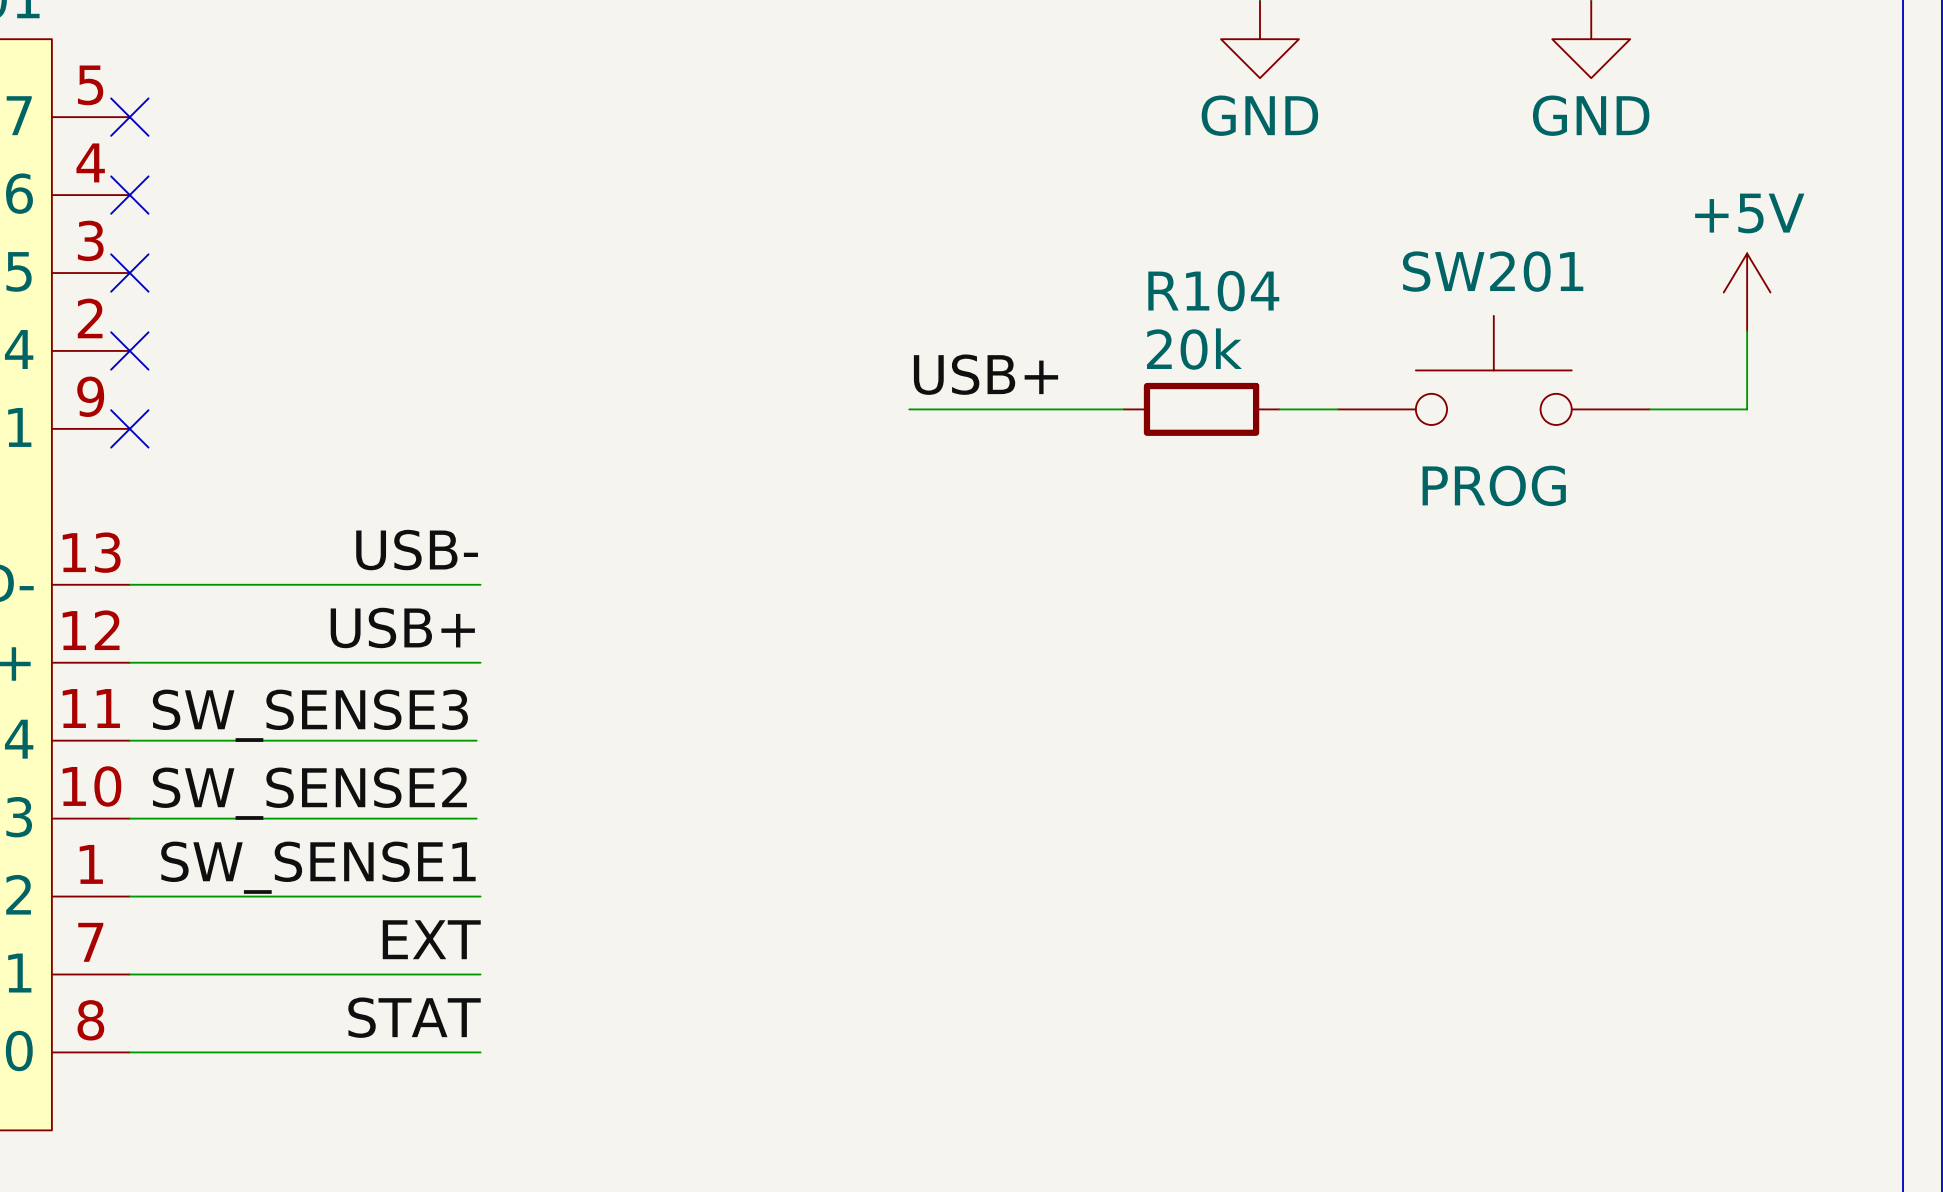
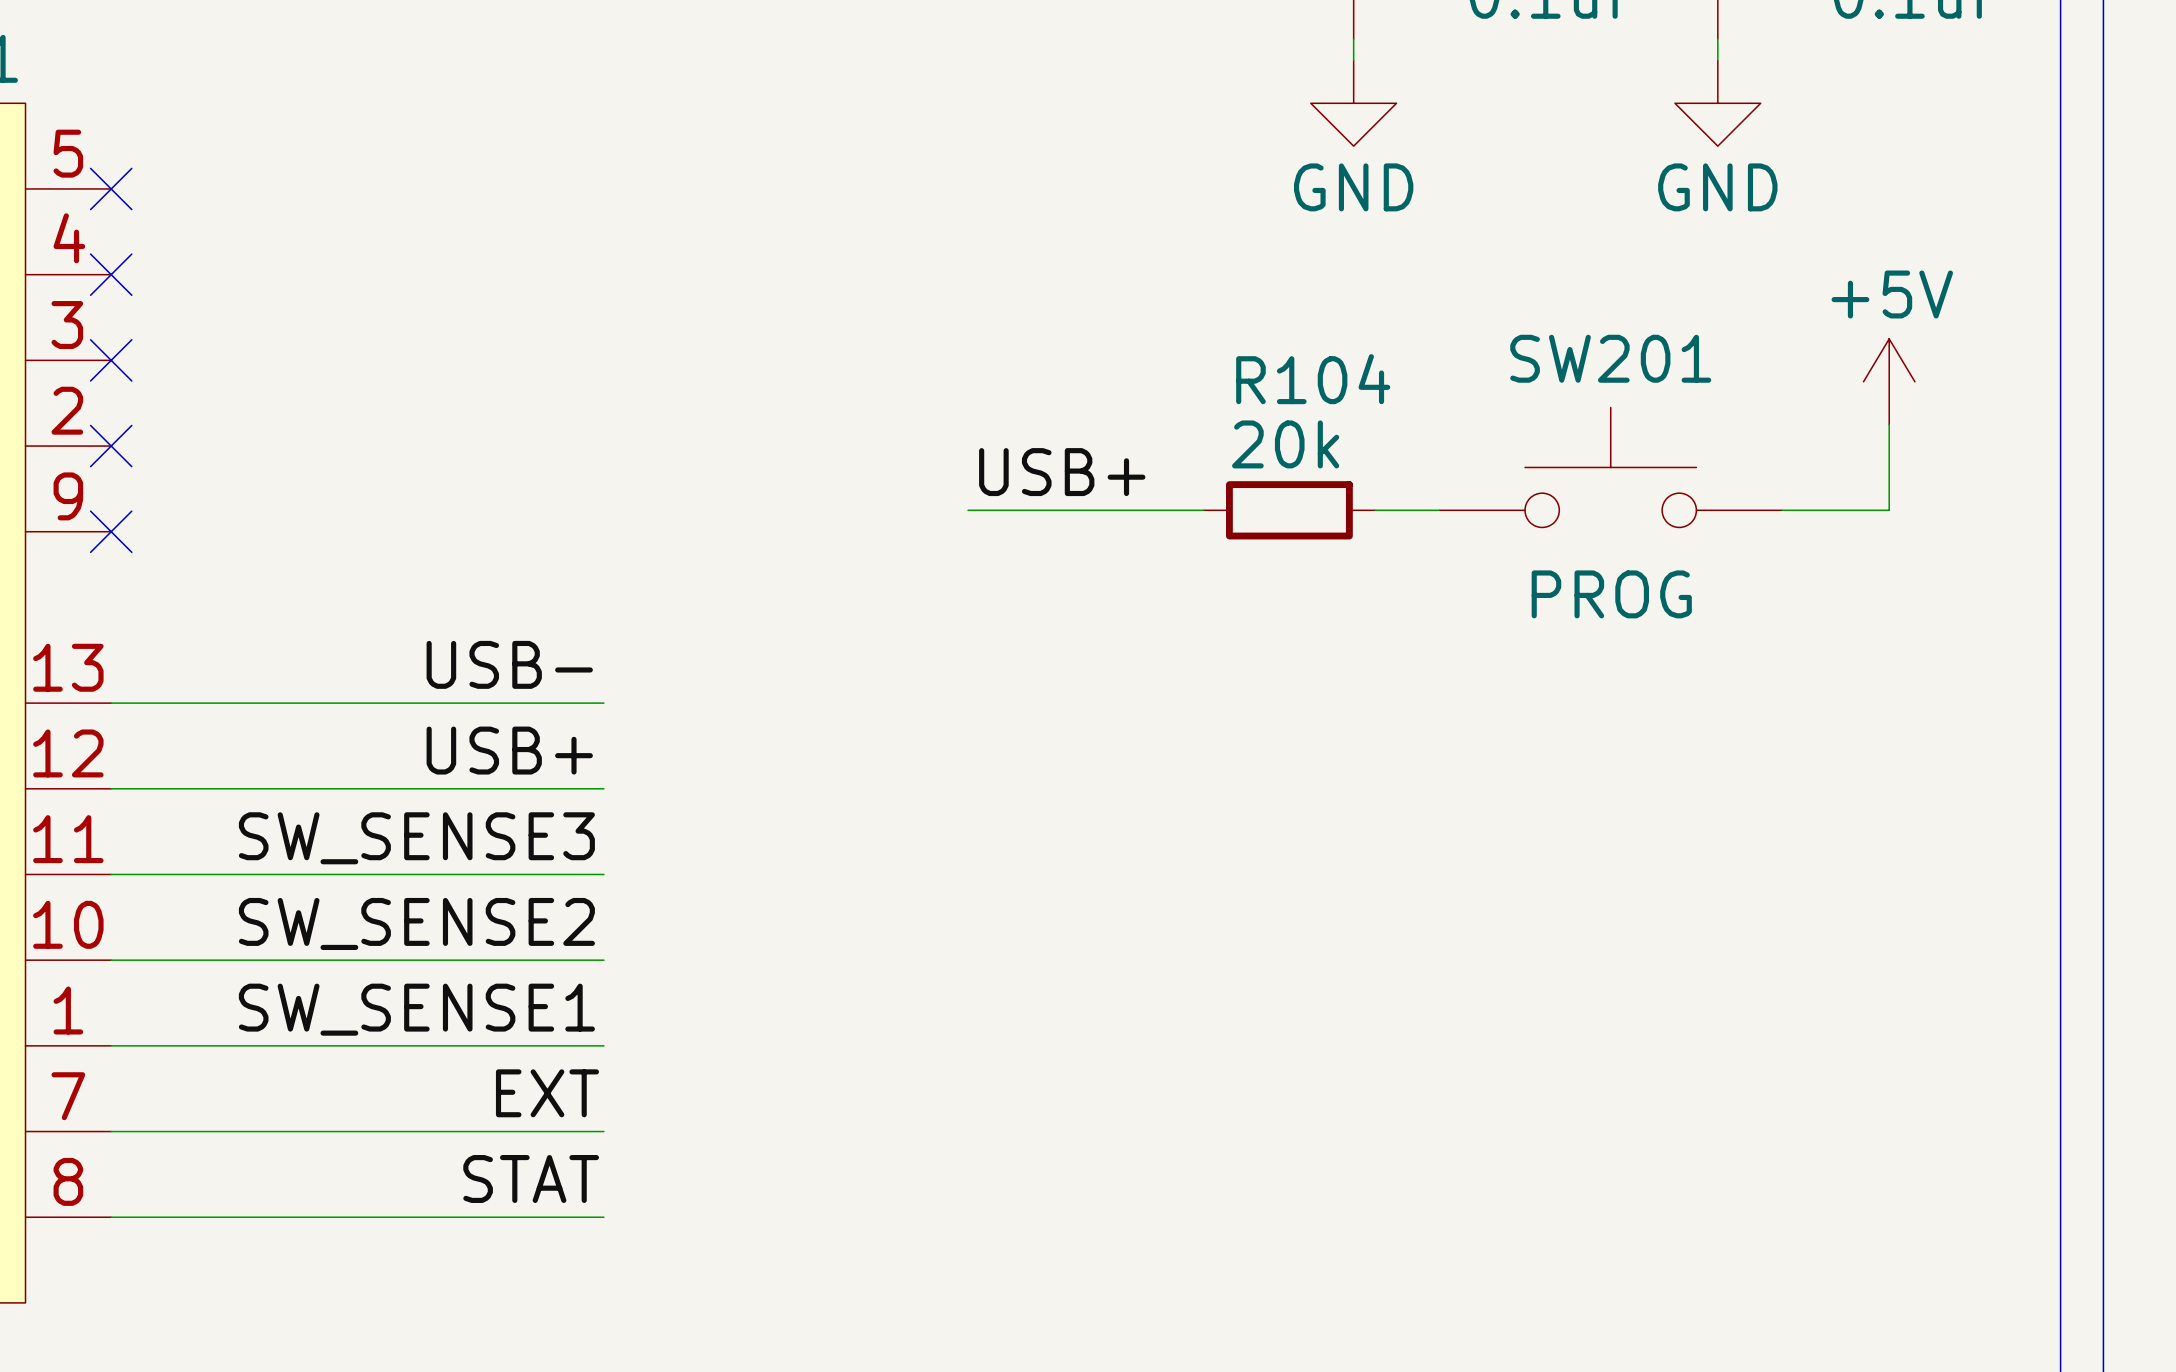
label position: USB- (417, 550) -> USB- (509, 664)
wire: none -> (496, 703) (603, 703)
label position: USB+ (402, 627) -> USB+ (509, 750)
wire: none -> (496, 788) (603, 788)
label position: SW_SENSE3 (310, 715) -> SW_SENSE3 (416, 838)
wire: none -> (492, 874) (603, 874)
label position: SW_SENSE2 (309, 793) -> SW_SENSE2 (416, 923)
wire: none -> (492, 960) (603, 960)
label position: SW_SENSE1 (318, 867) -> SW_SENSE1 (416, 1009)
wire: none -> (496, 1045) (603, 1045)
label position: EXT (431, 939) -> EXT (547, 1093)
wire: none -> (496, 1131) (603, 1131)
label position: STAT (414, 1017) -> STAT (531, 1179)
wire: none -> (496, 1217) (603, 1217)

